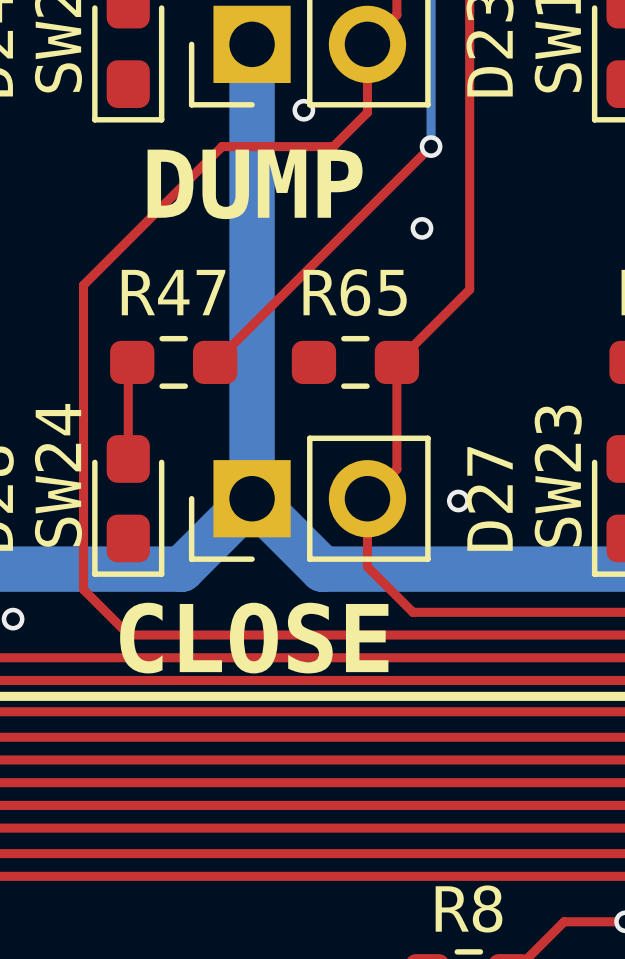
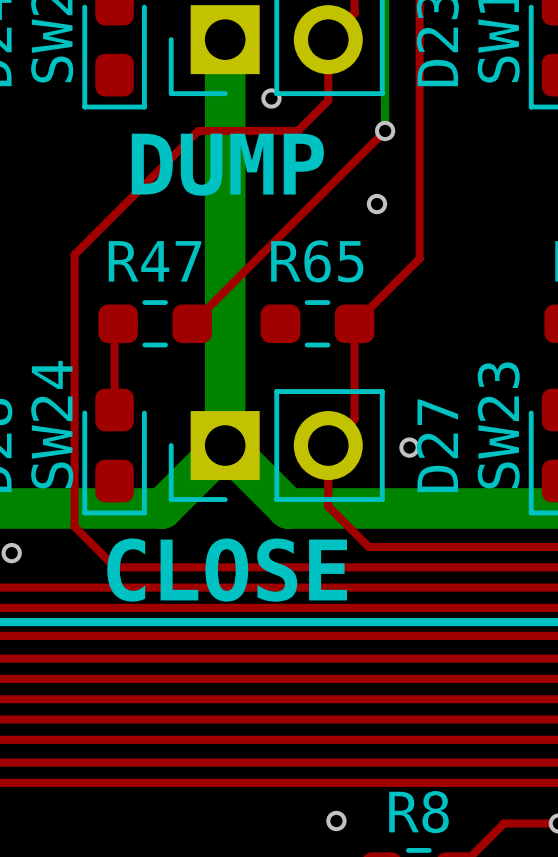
via: none -> (336, 821)

